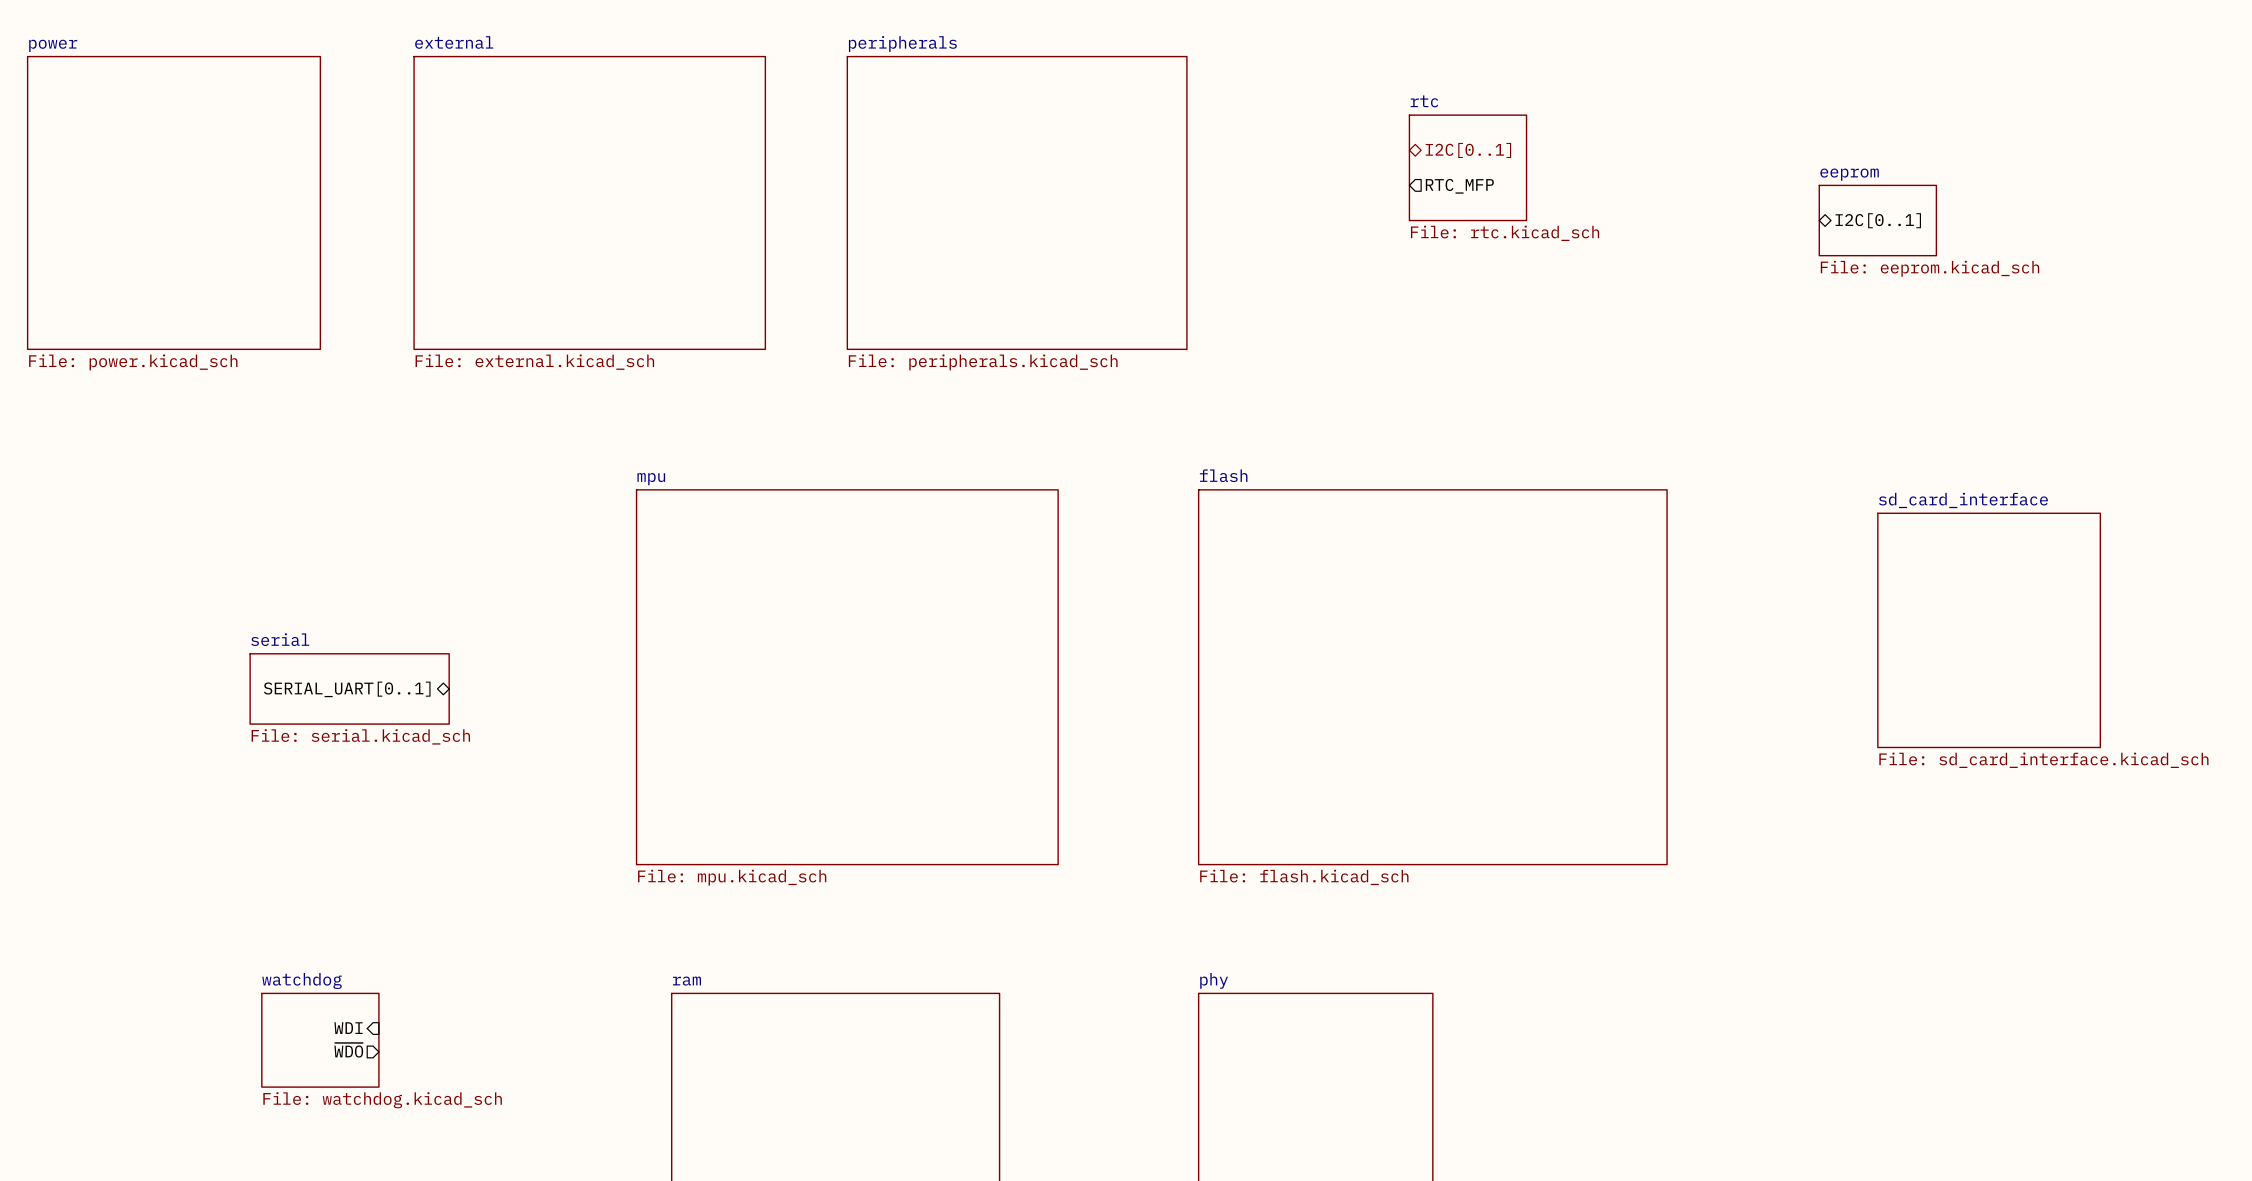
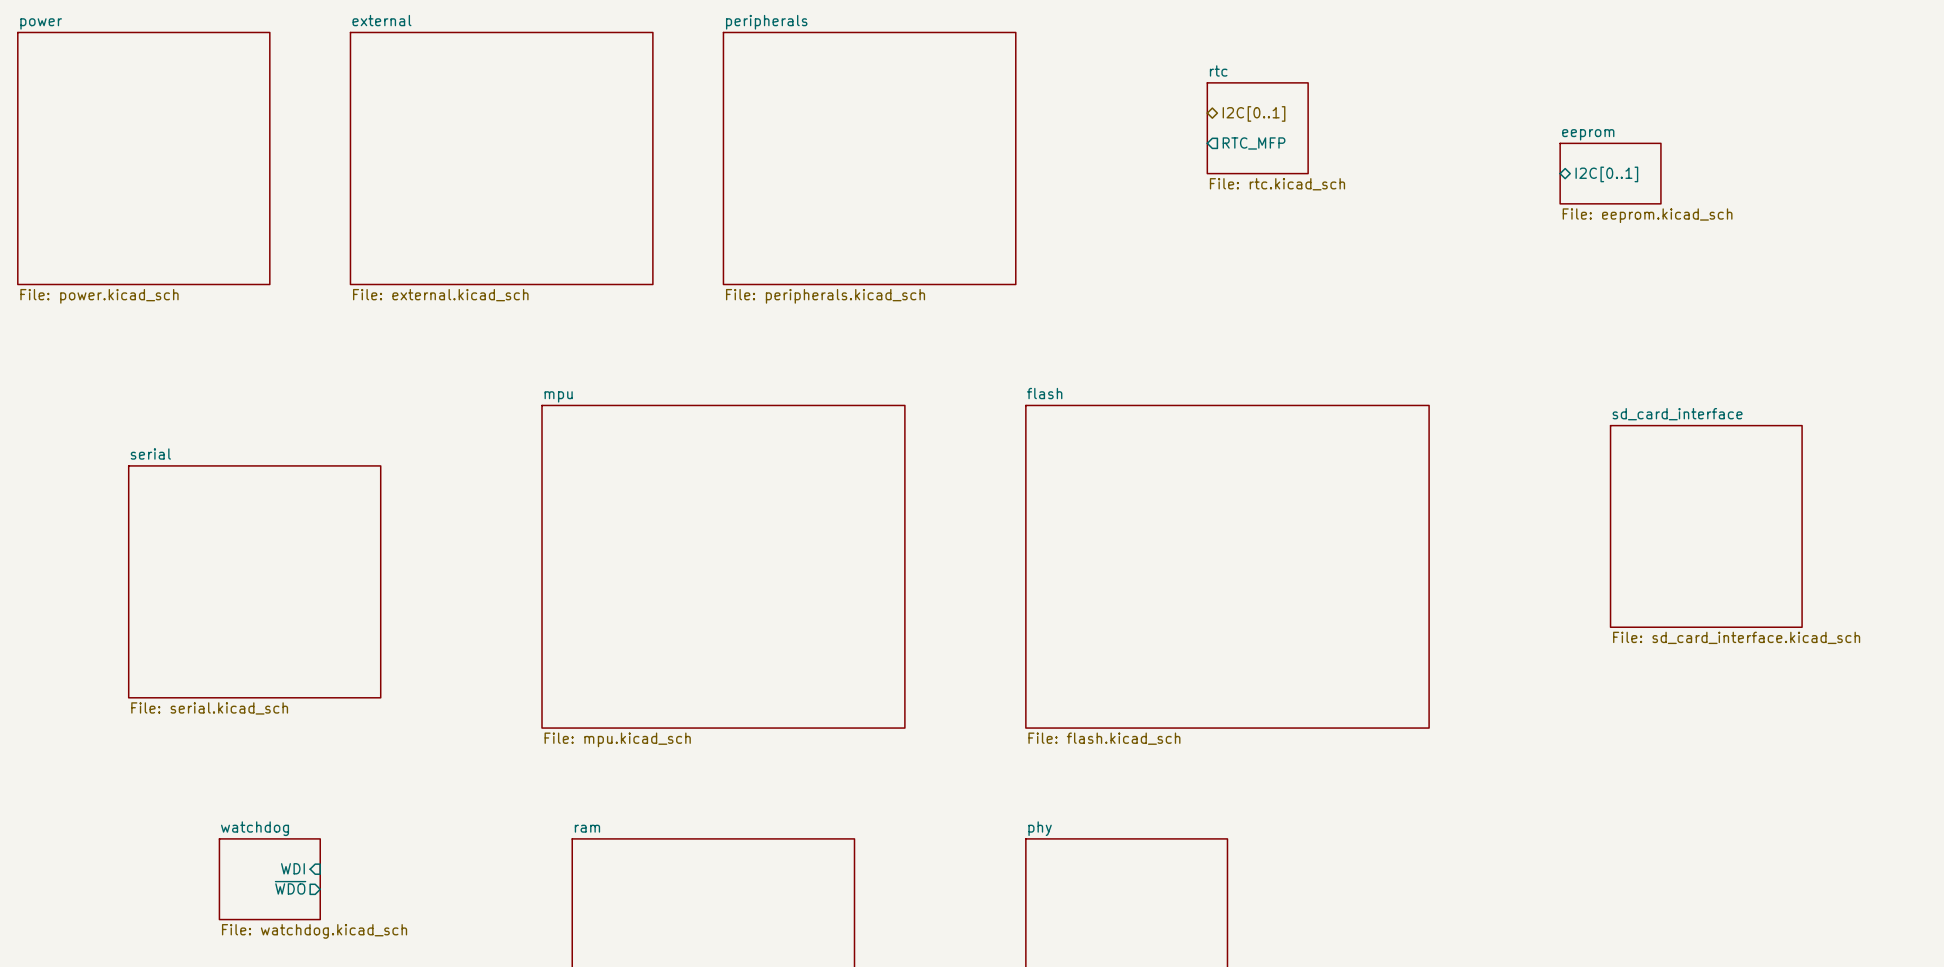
sheet serial: File: serial.kicad_sch (349, 688) -> none
sheet pin: SERIAL_UART[0..1] (347, 689) -> none
sheet serial: none -> File: serial.kicad_sch (254, 581)

